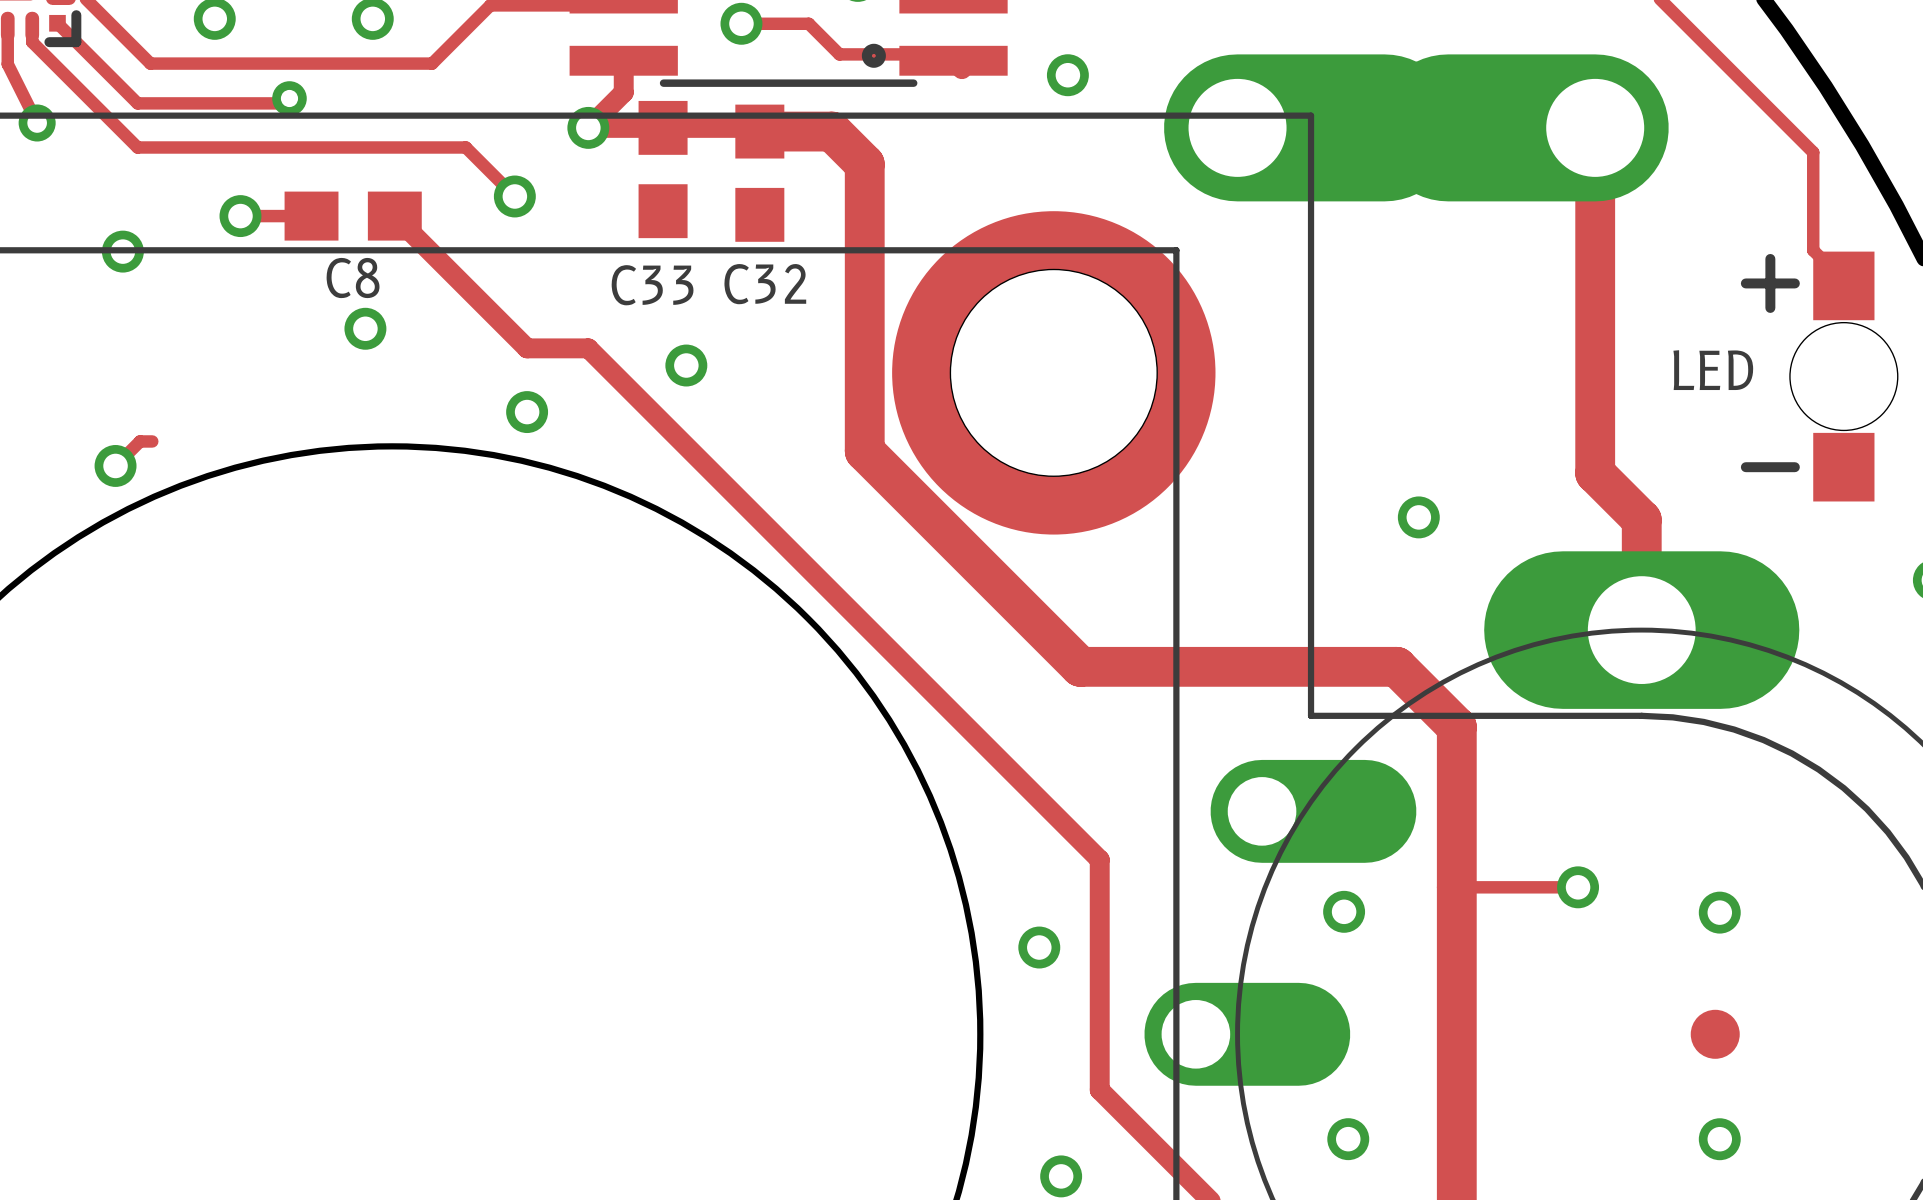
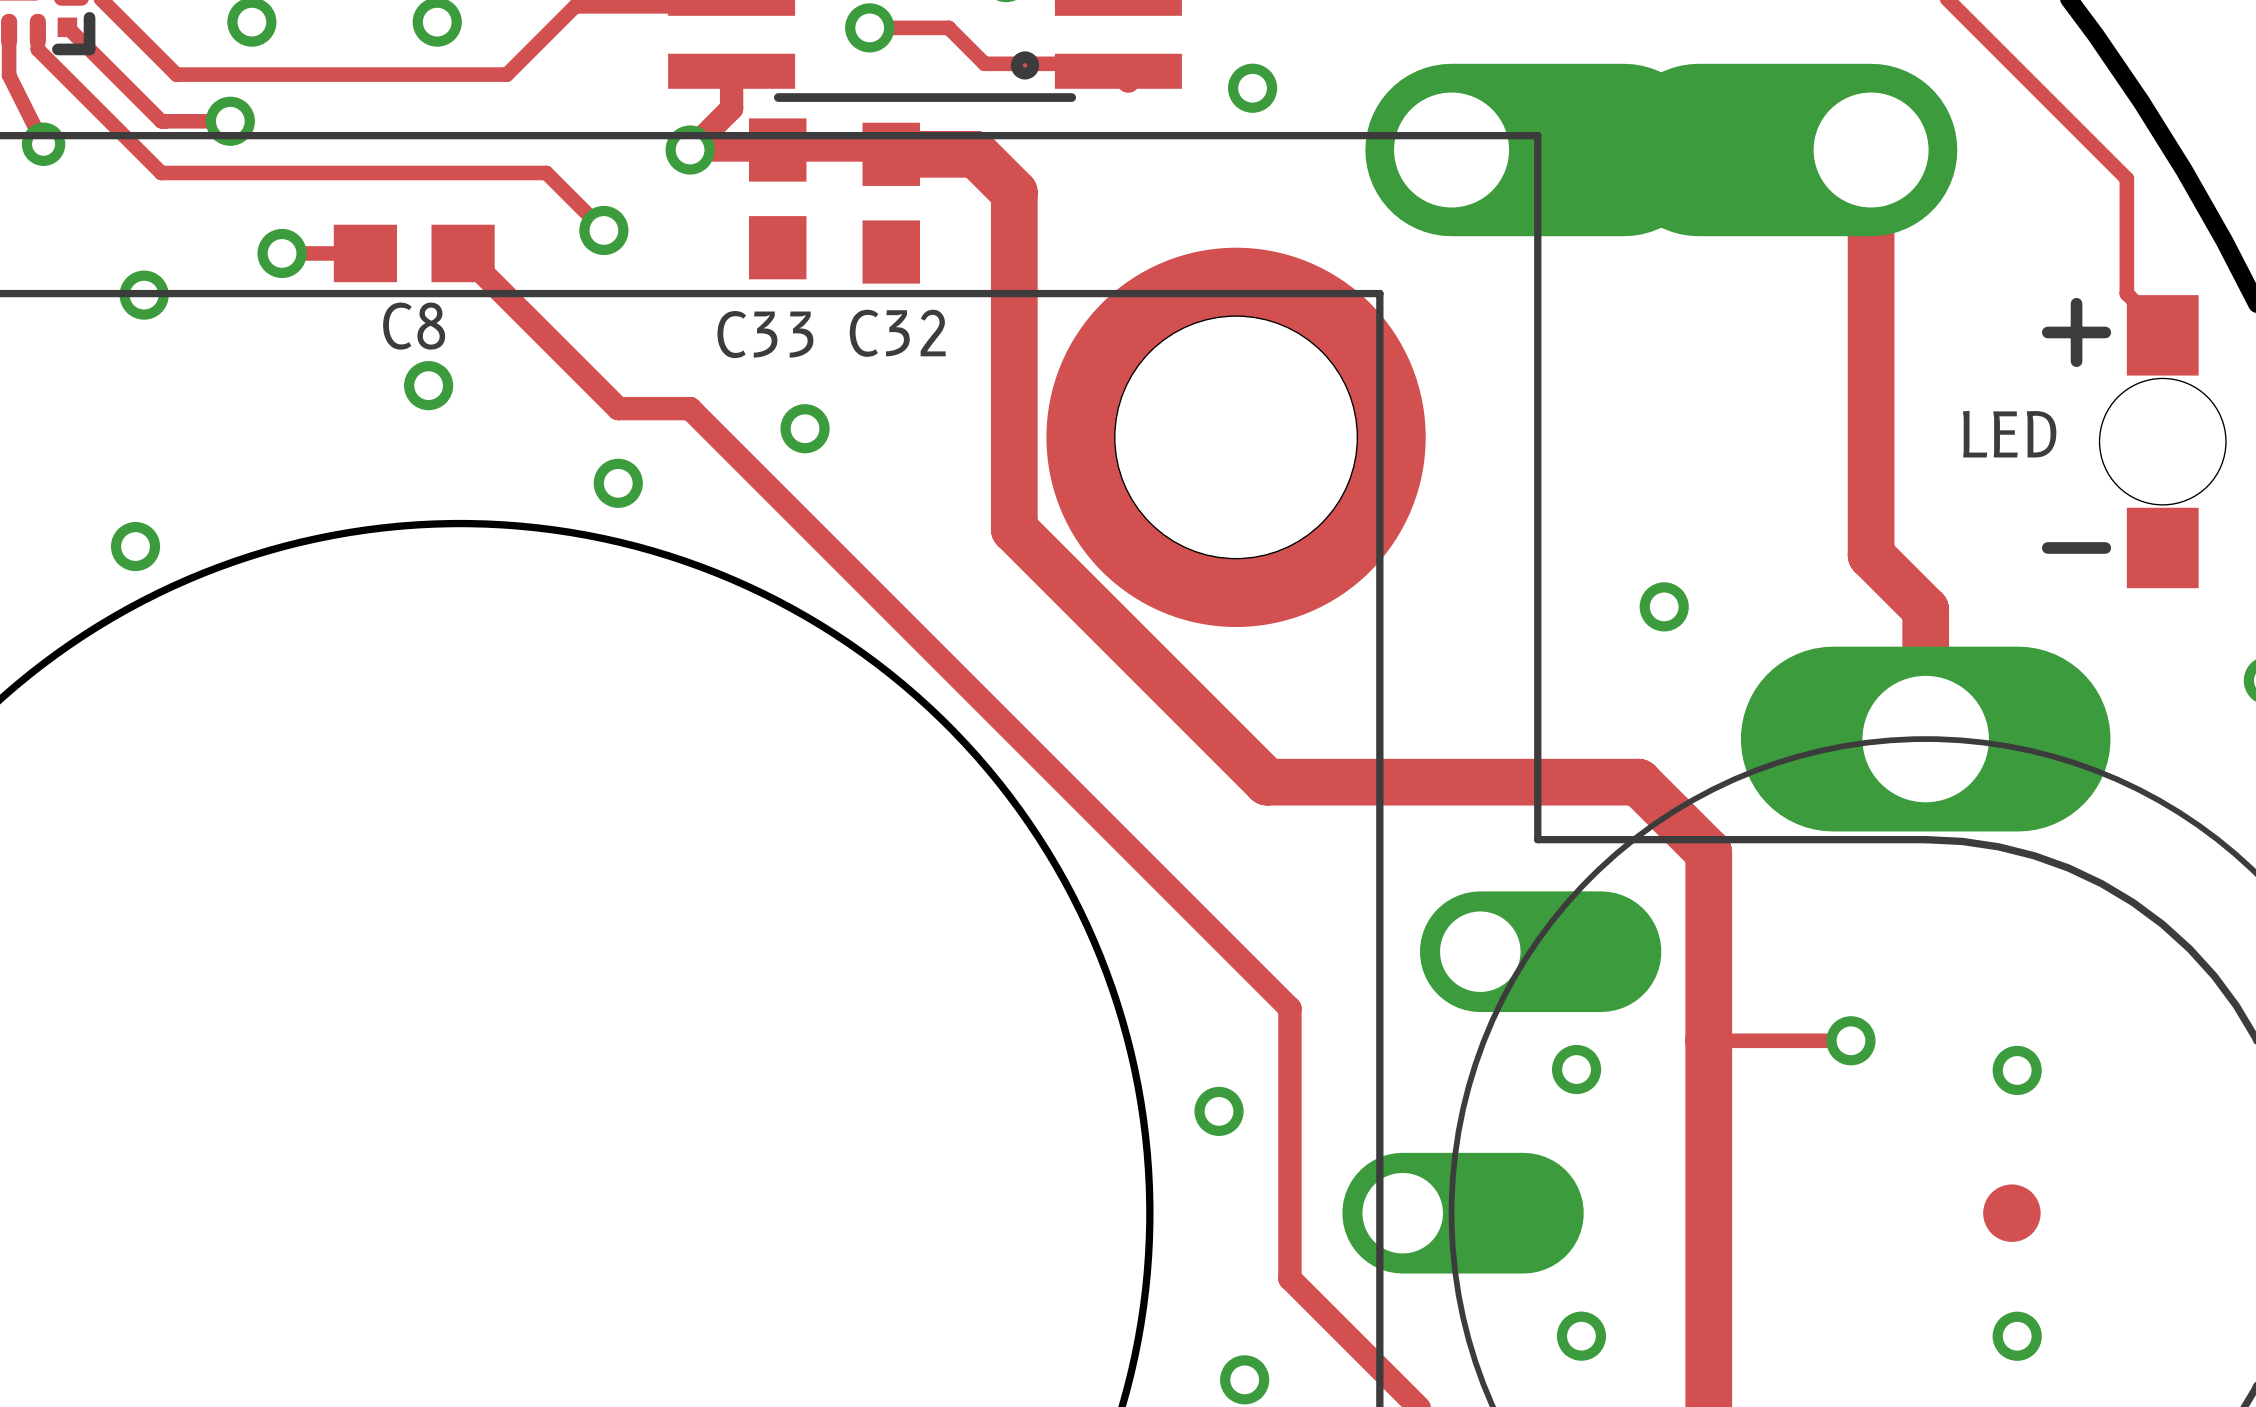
track: (289, 98) (284, 103) (196, 103) -> none
via: (289, 98) -> none
via: none -> (230, 121)
track: (152, 441) (140, 441) (115, 465) -> none

